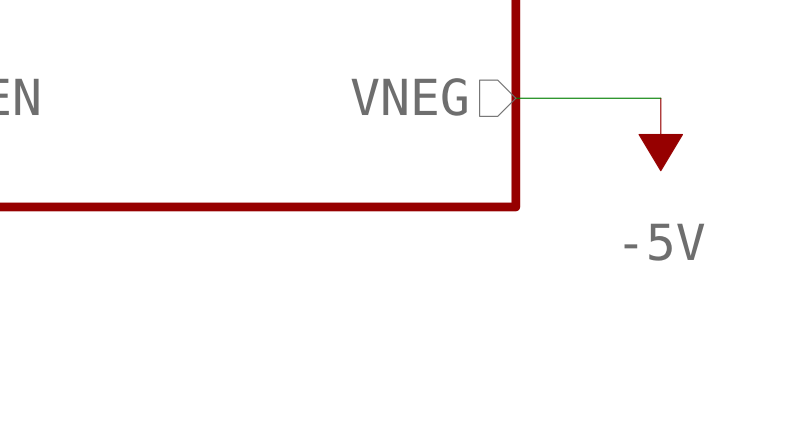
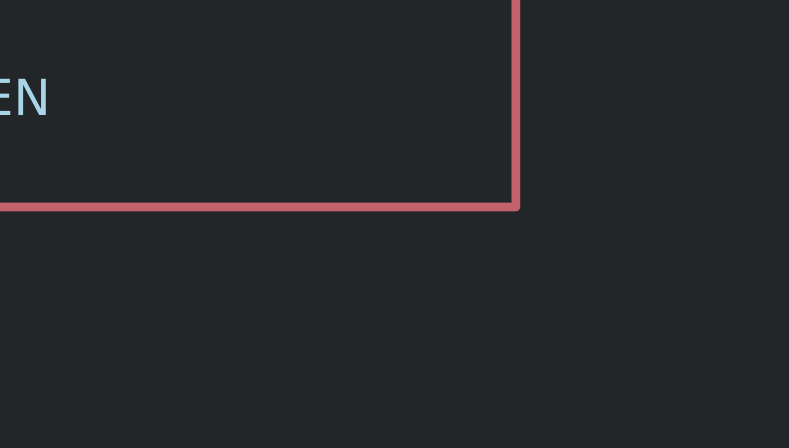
sheet pin: VNEG (409, 96) -> none
wire: (515, 98) (660, 98) -> none
power symbol: -5V (660, 134) -> none

